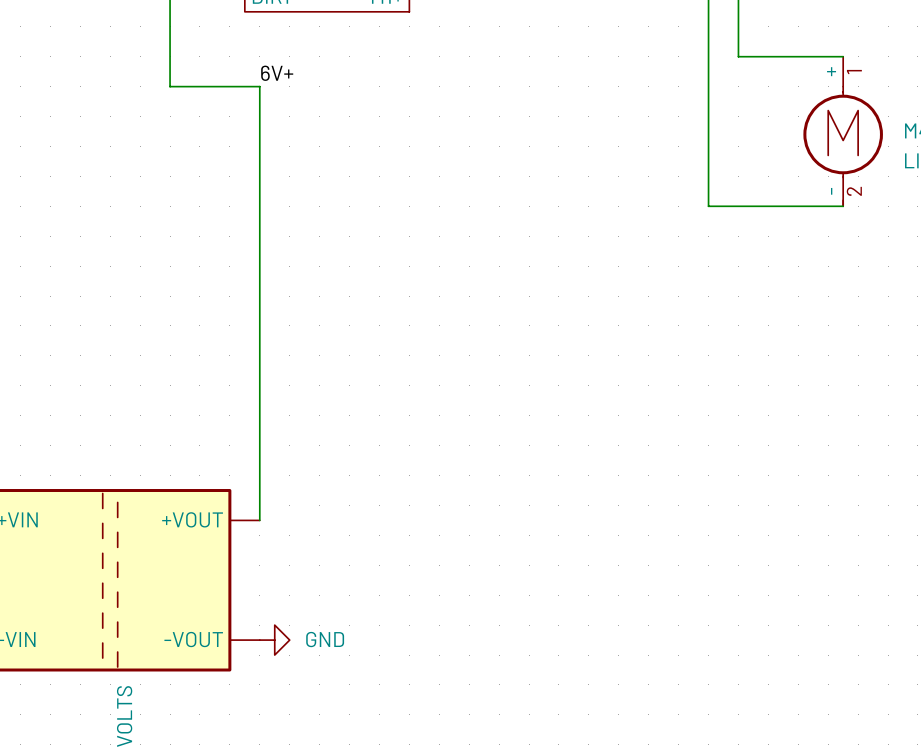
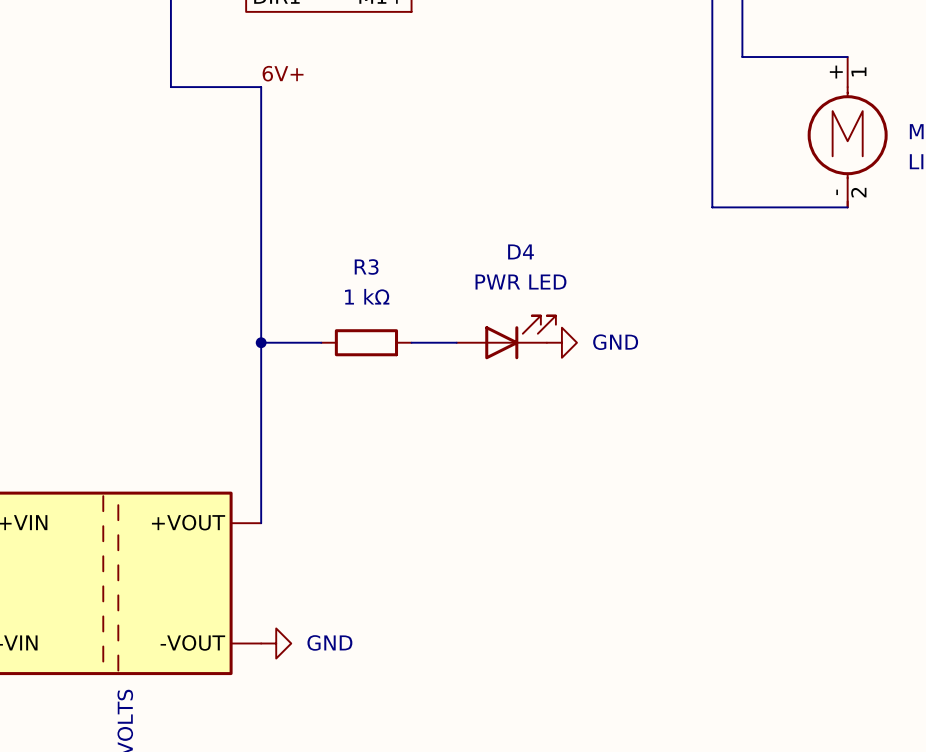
D4: none -> PWR LED (506, 337)
wire: none -> (261, 342) (321, 342)
junction: none -> (261, 342)
R3: none -> 1 kΩ (366, 342)
wire: none -> (411, 342) (456, 342)
power symbol: none -> GND (561, 342)

